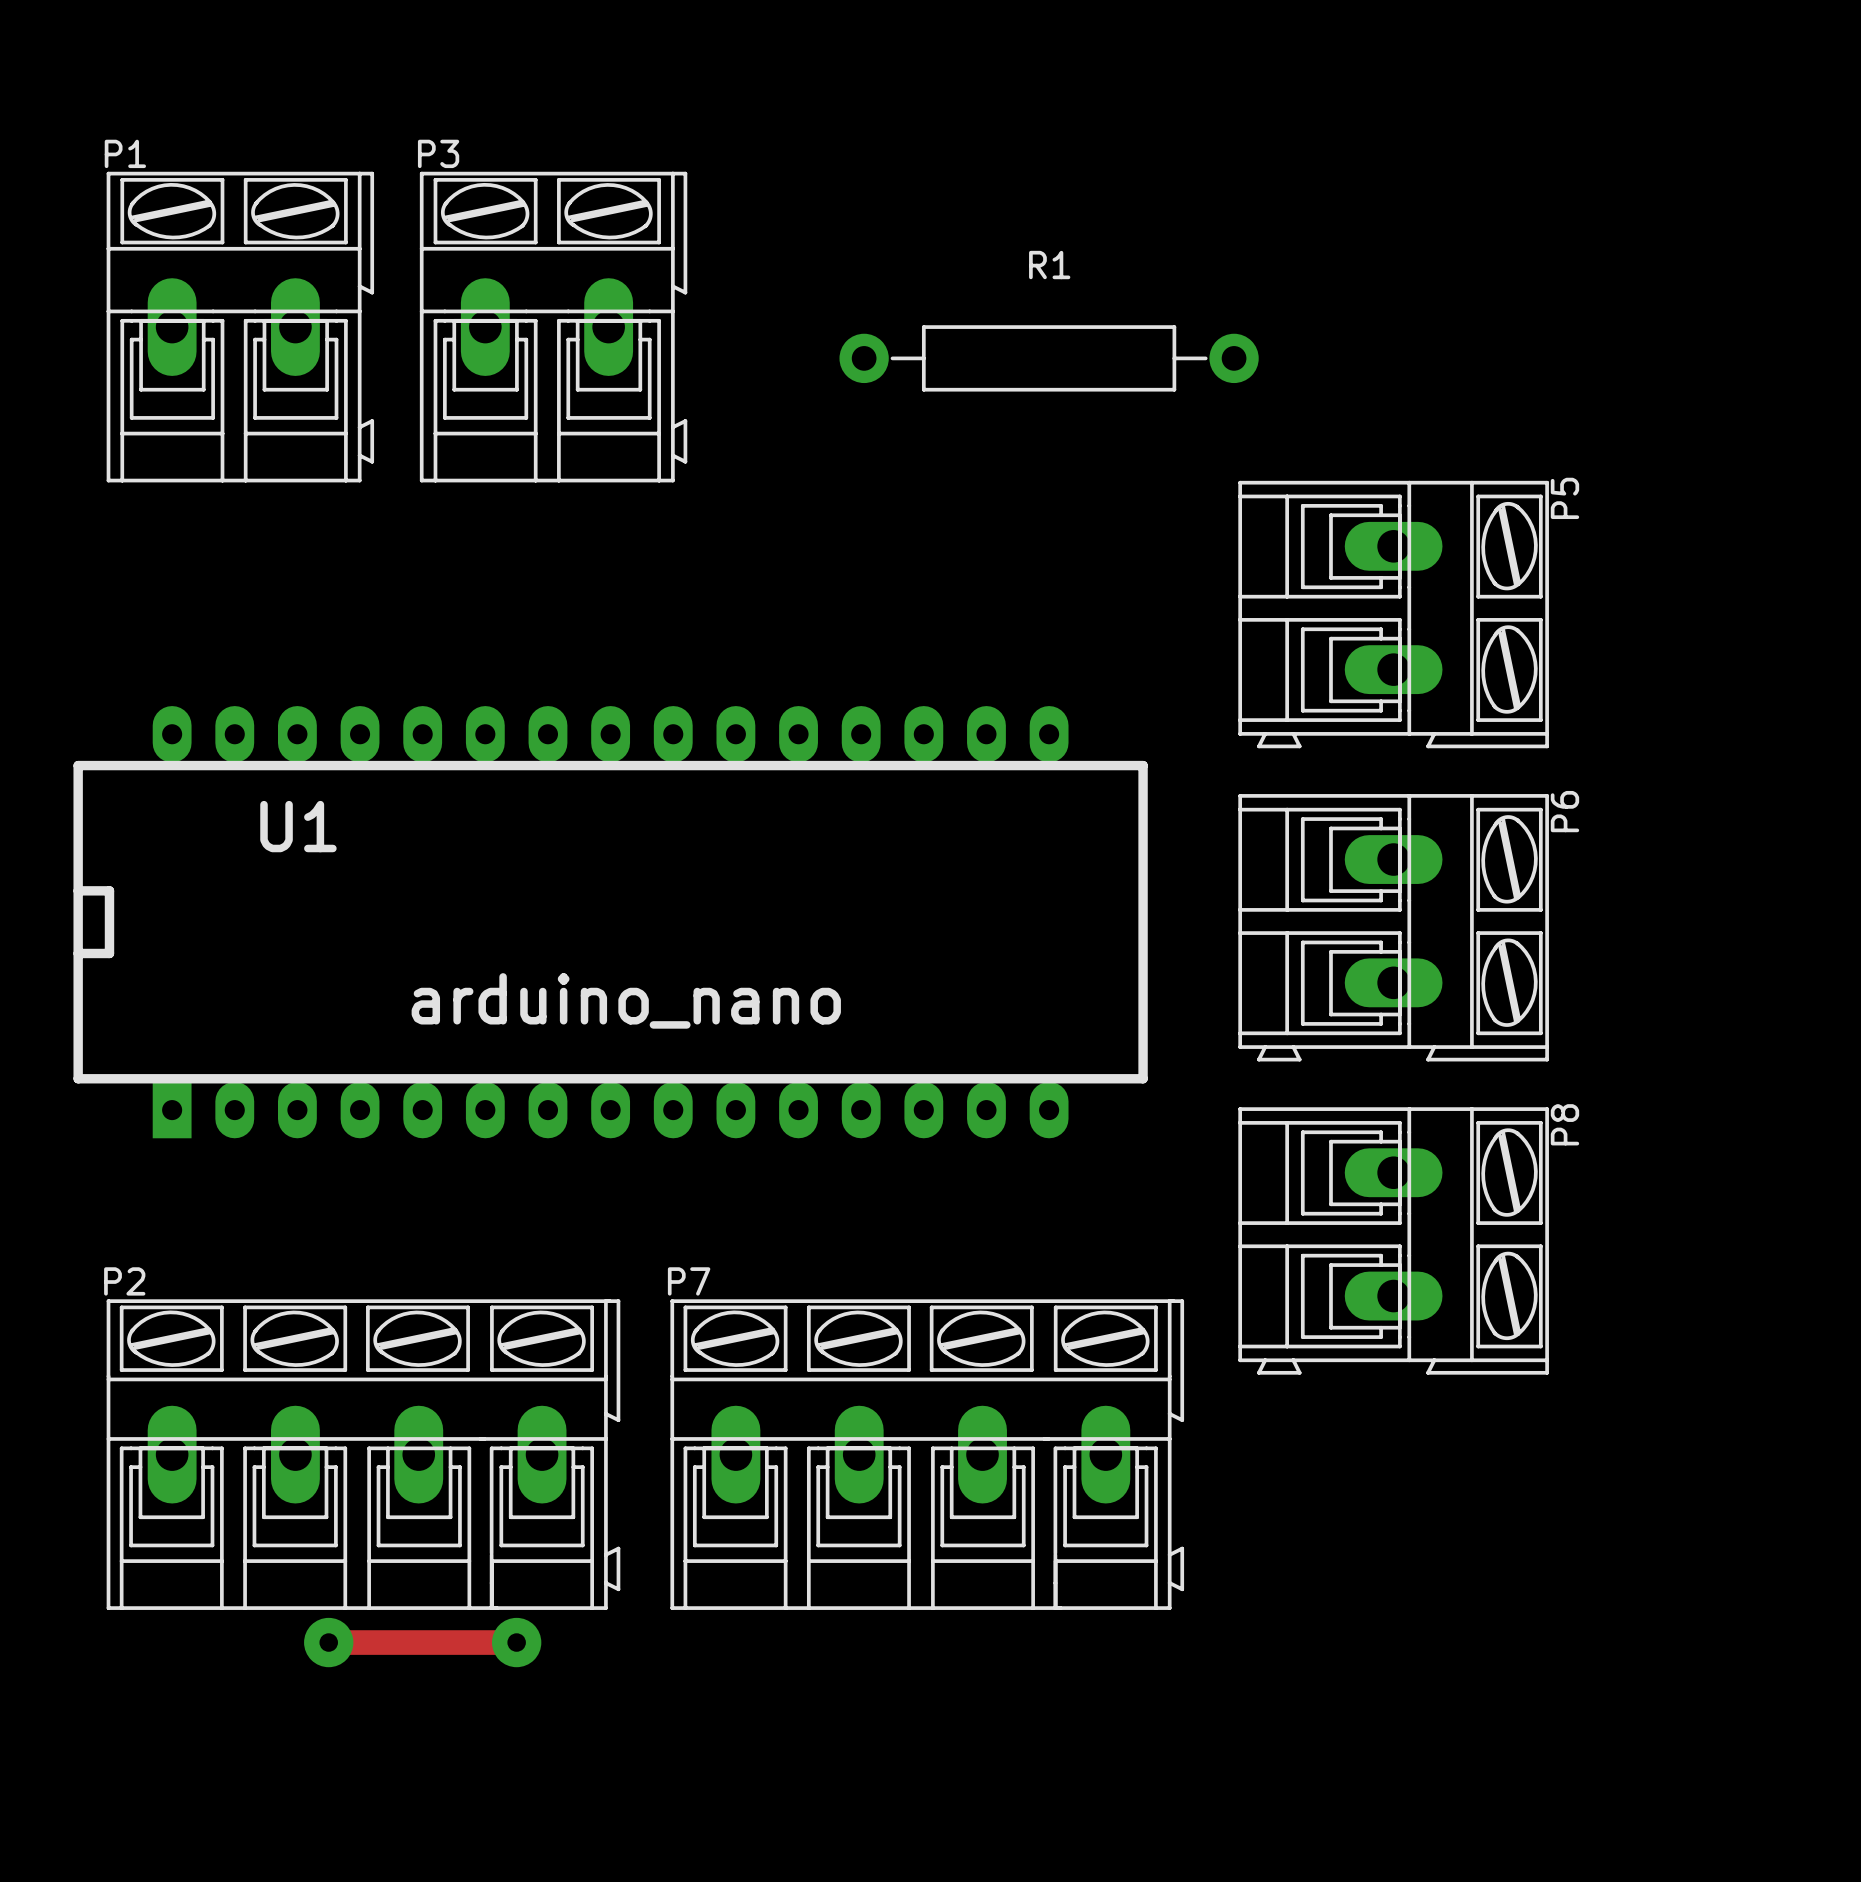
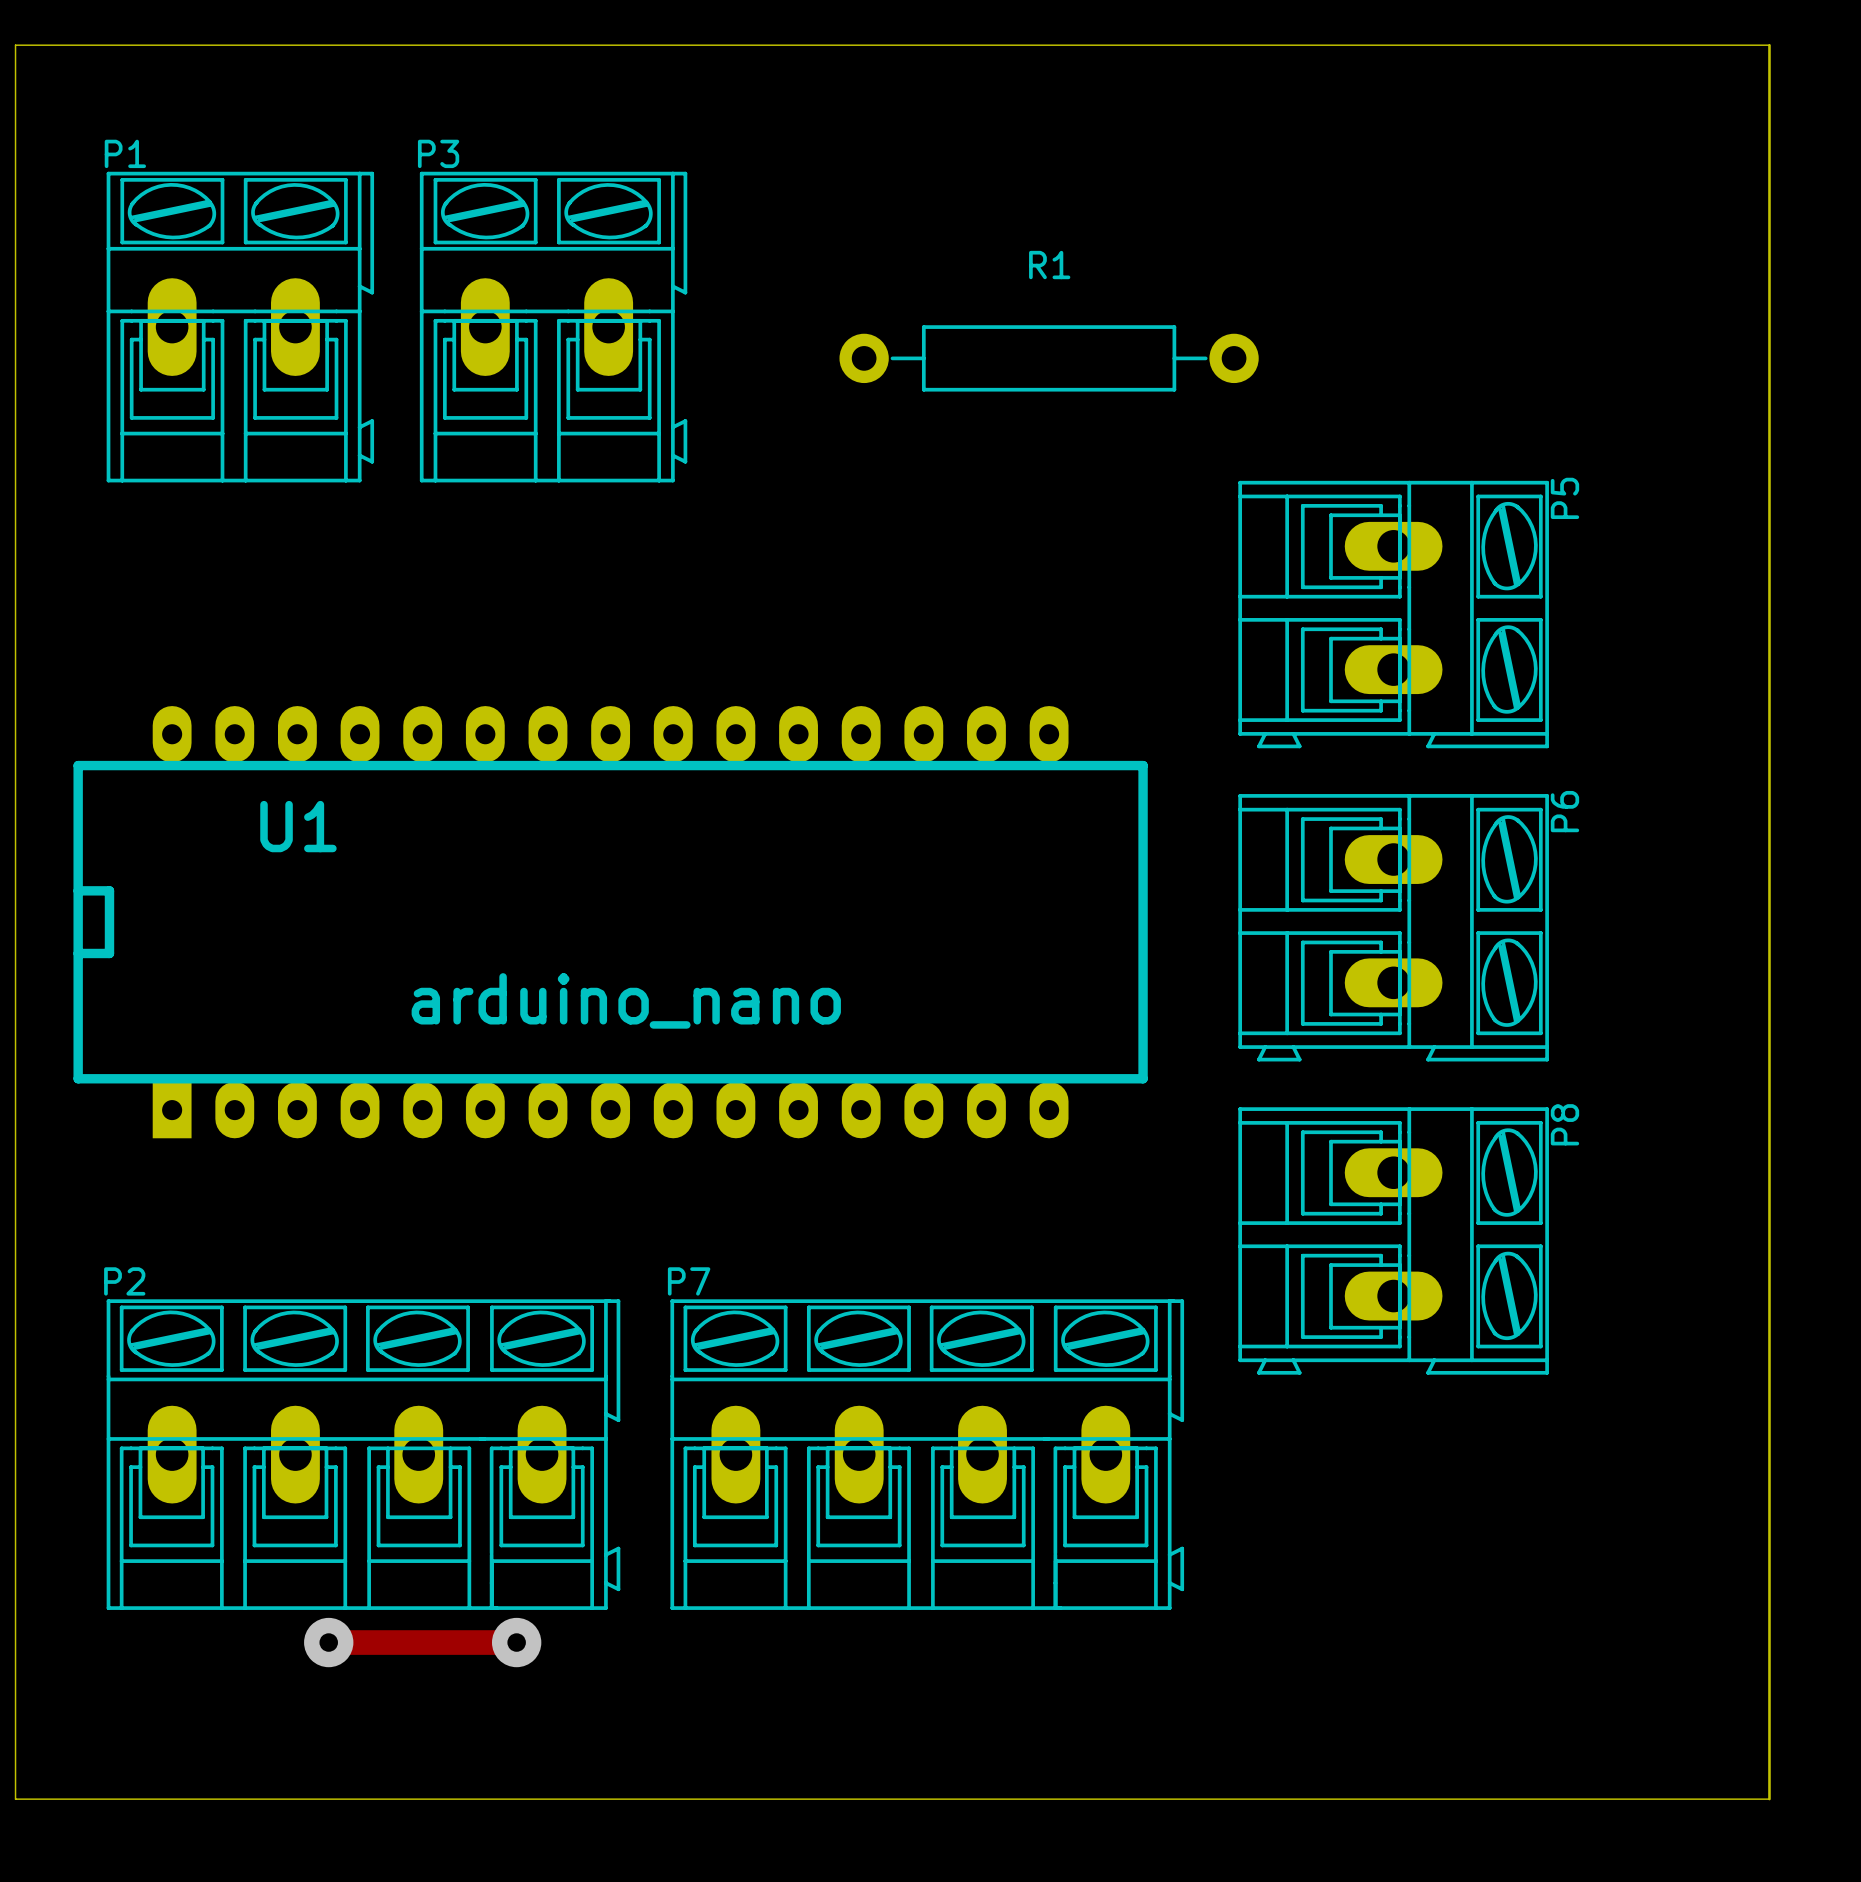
board edge: none -> (1769, 45) (15, 45) (15, 1799) (1769, 1799)
board edge: none -> (1769, 45) (1769, 1799)

